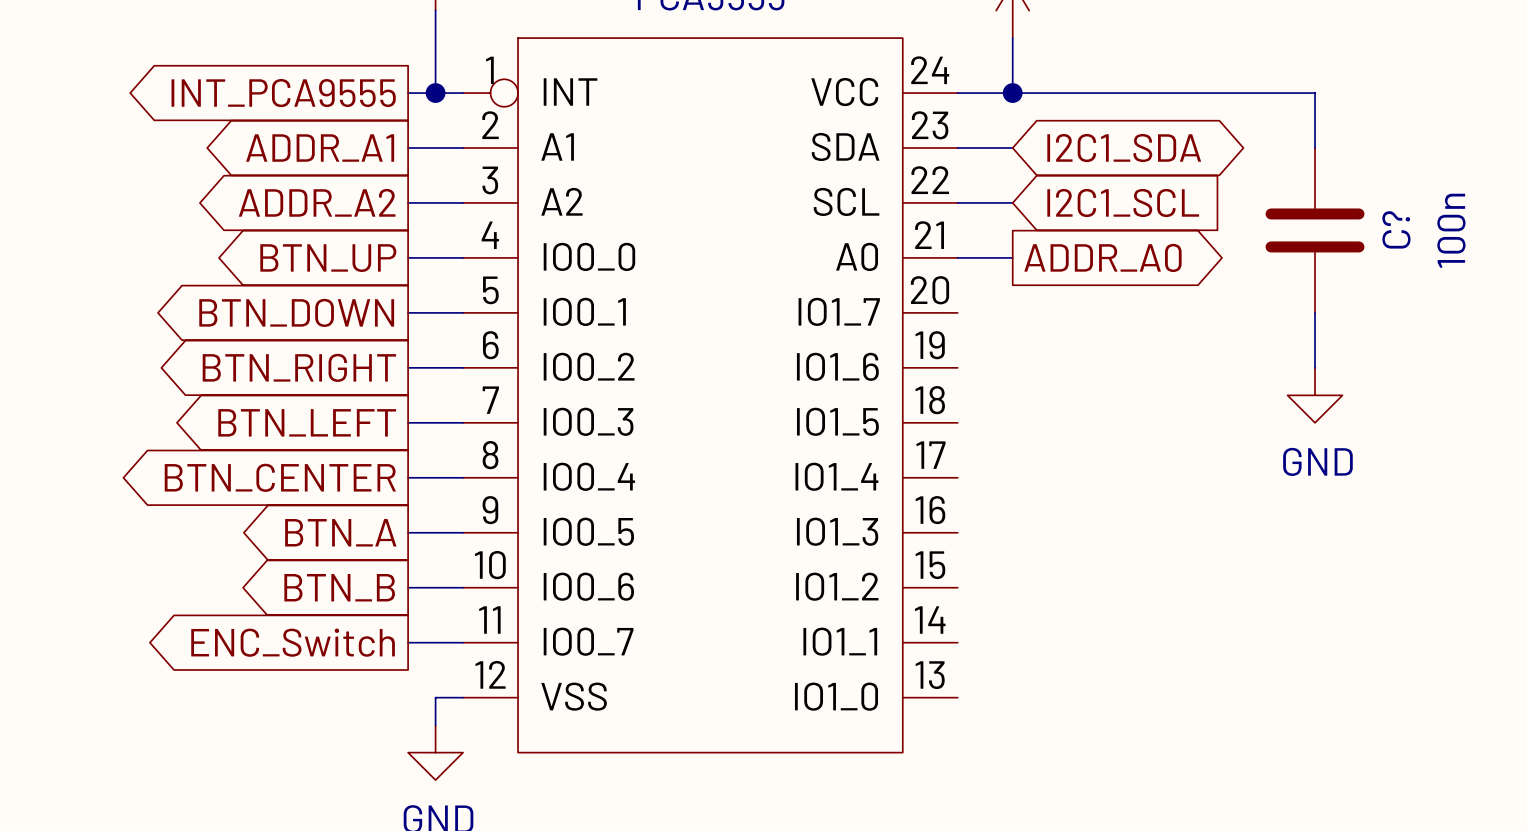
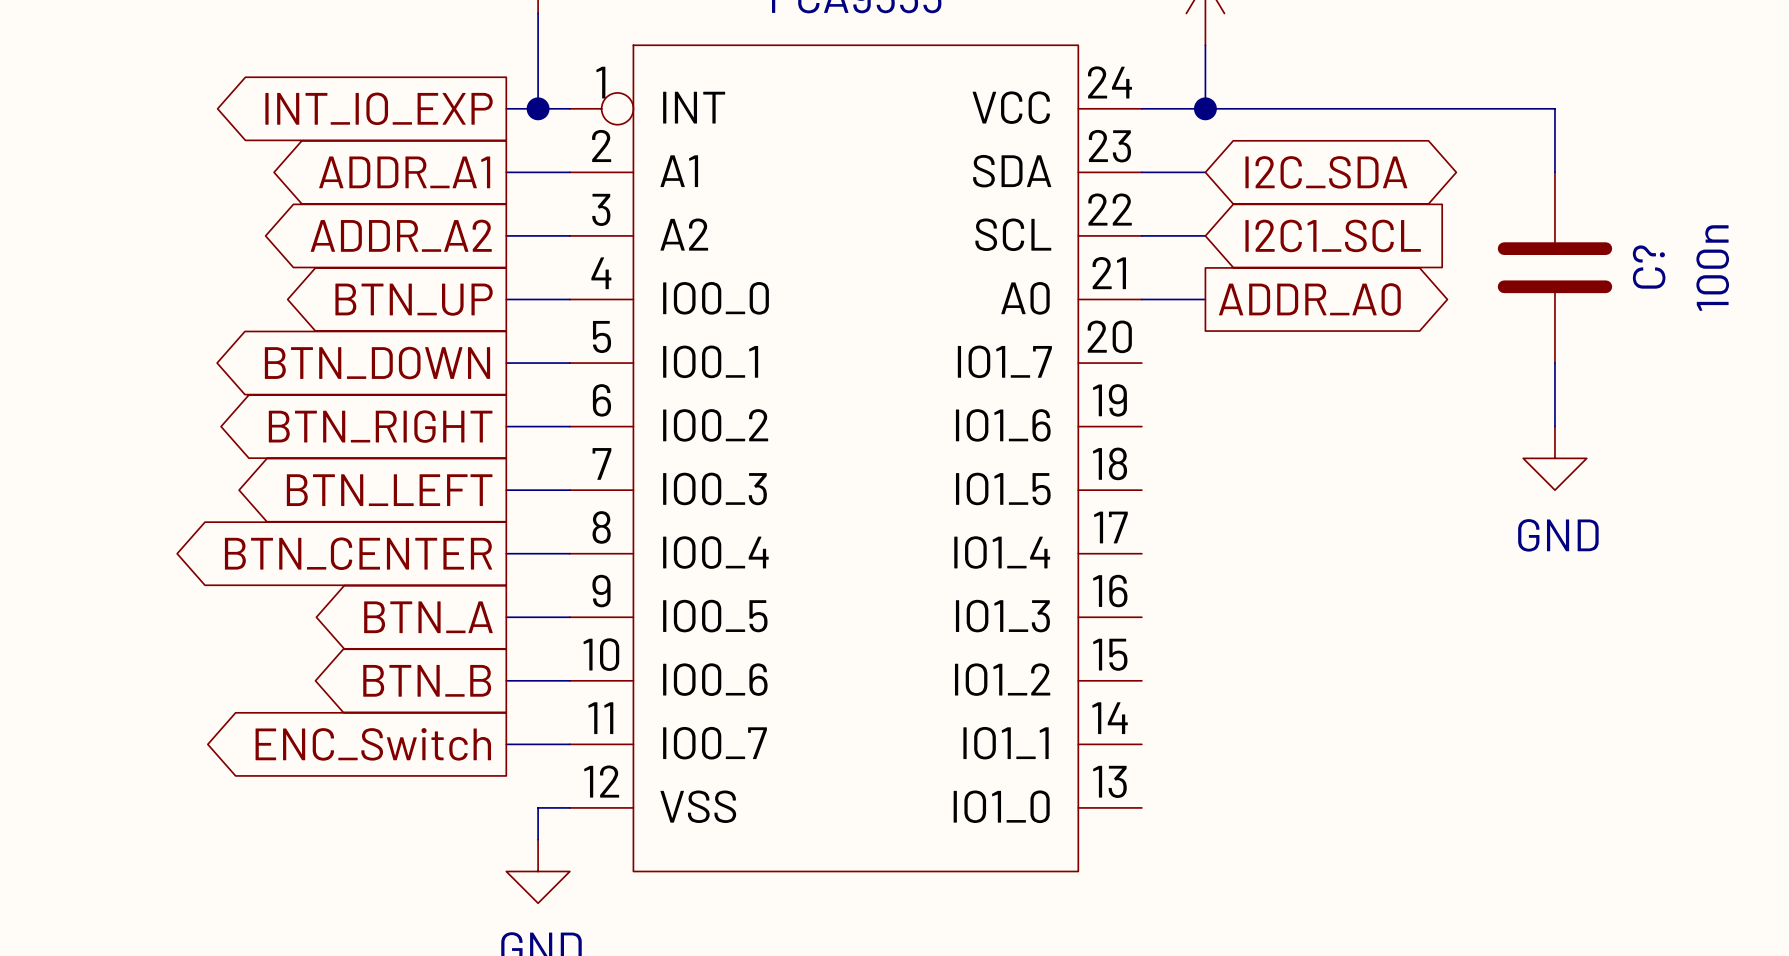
global label: INT_PCA9555 (283, 93) -> INT_IO_EXP (379, 108)
global label: I2C1_SDA (1124, 148) -> I2C_SDA (1326, 172)

